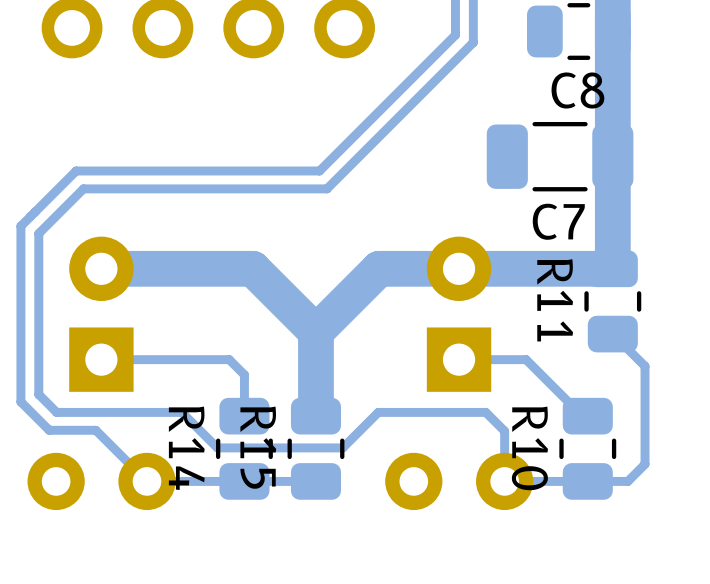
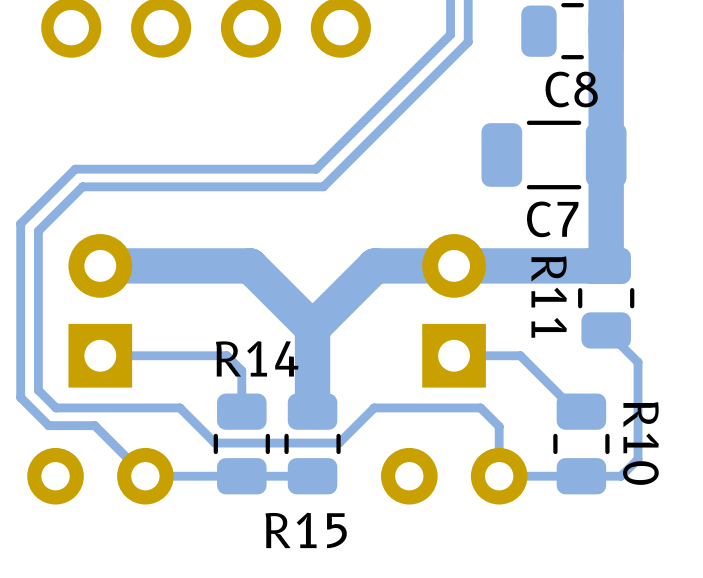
R15 name rotation: 0° (258, 447) -> 90° counterclockwise (306, 530)
R14 name rotation: 0° (186, 448) -> 90° counterclockwise (257, 358)
R10 name position: R10 (529, 448) -> R10 (640, 443)

